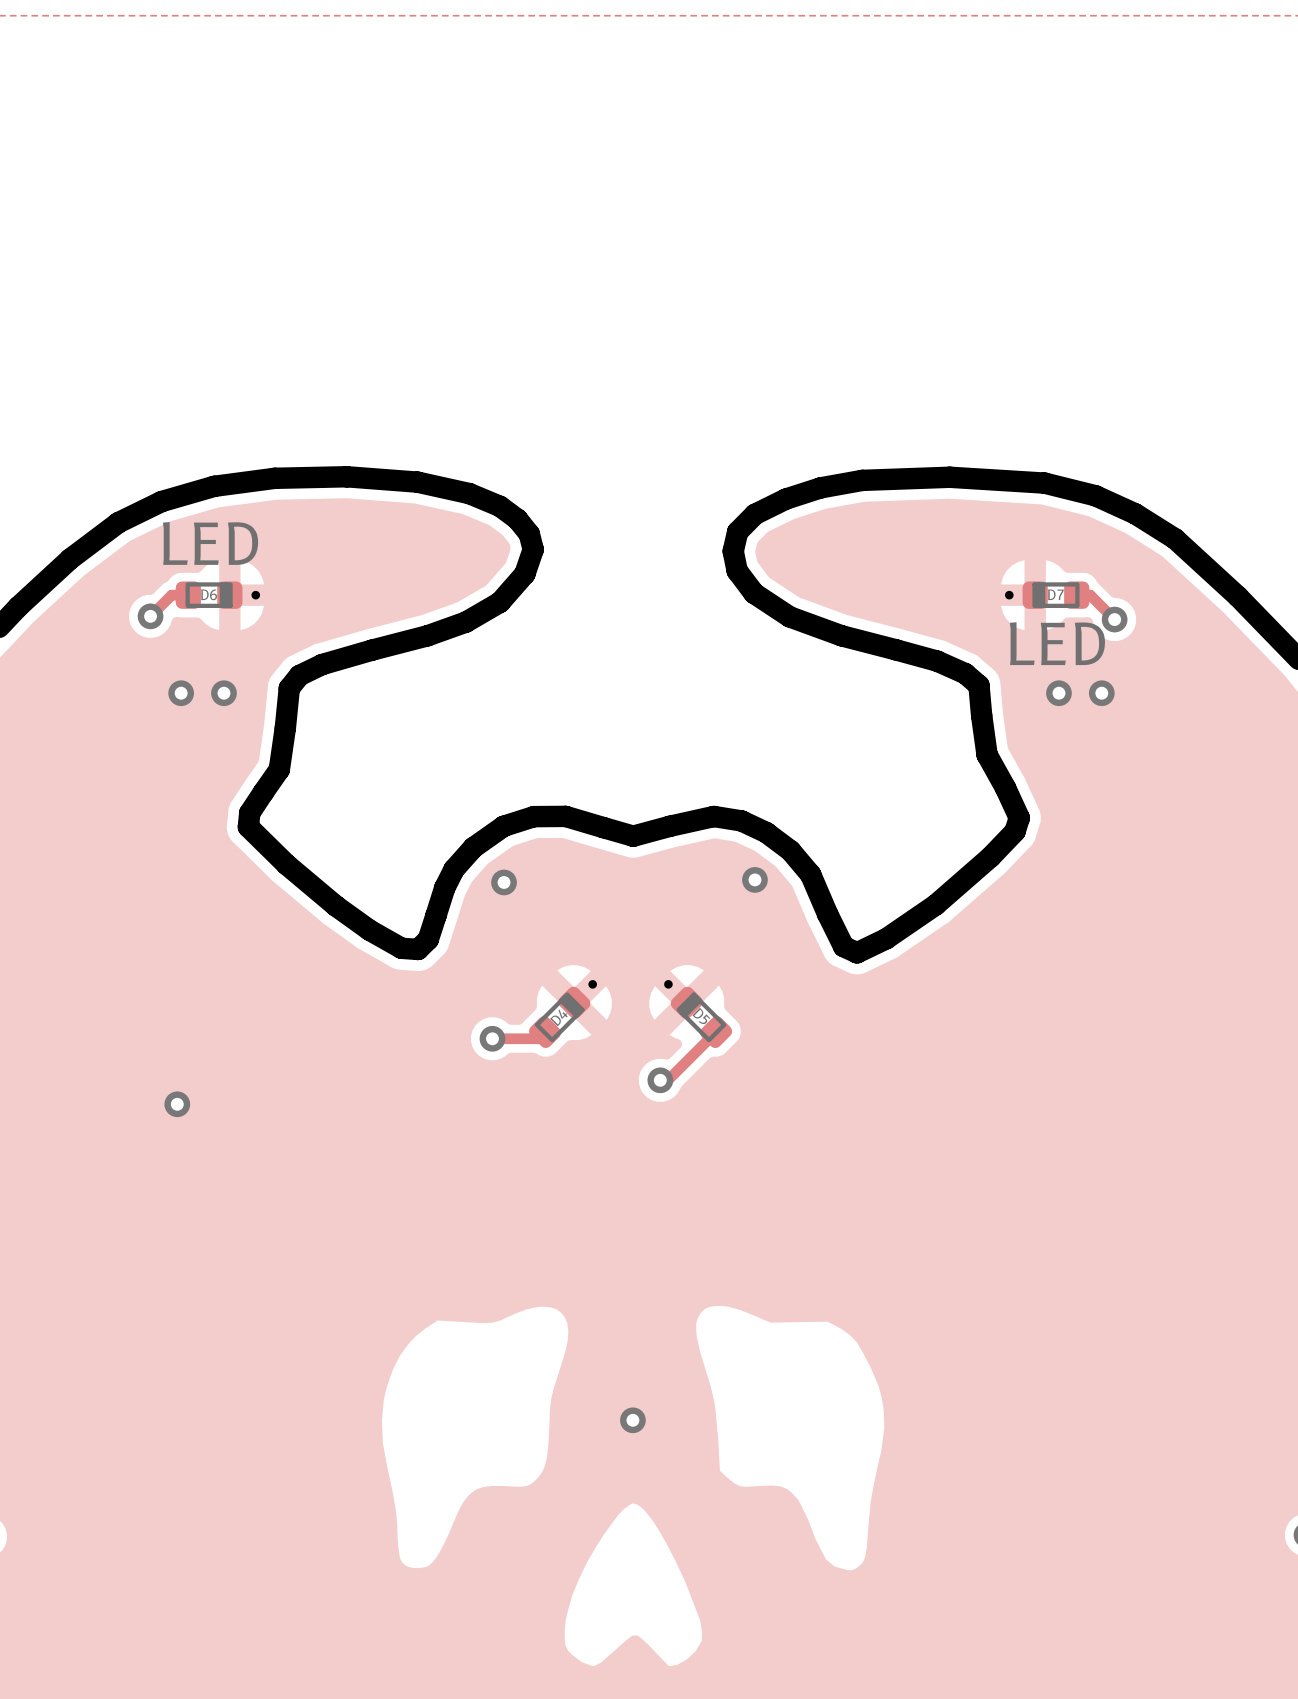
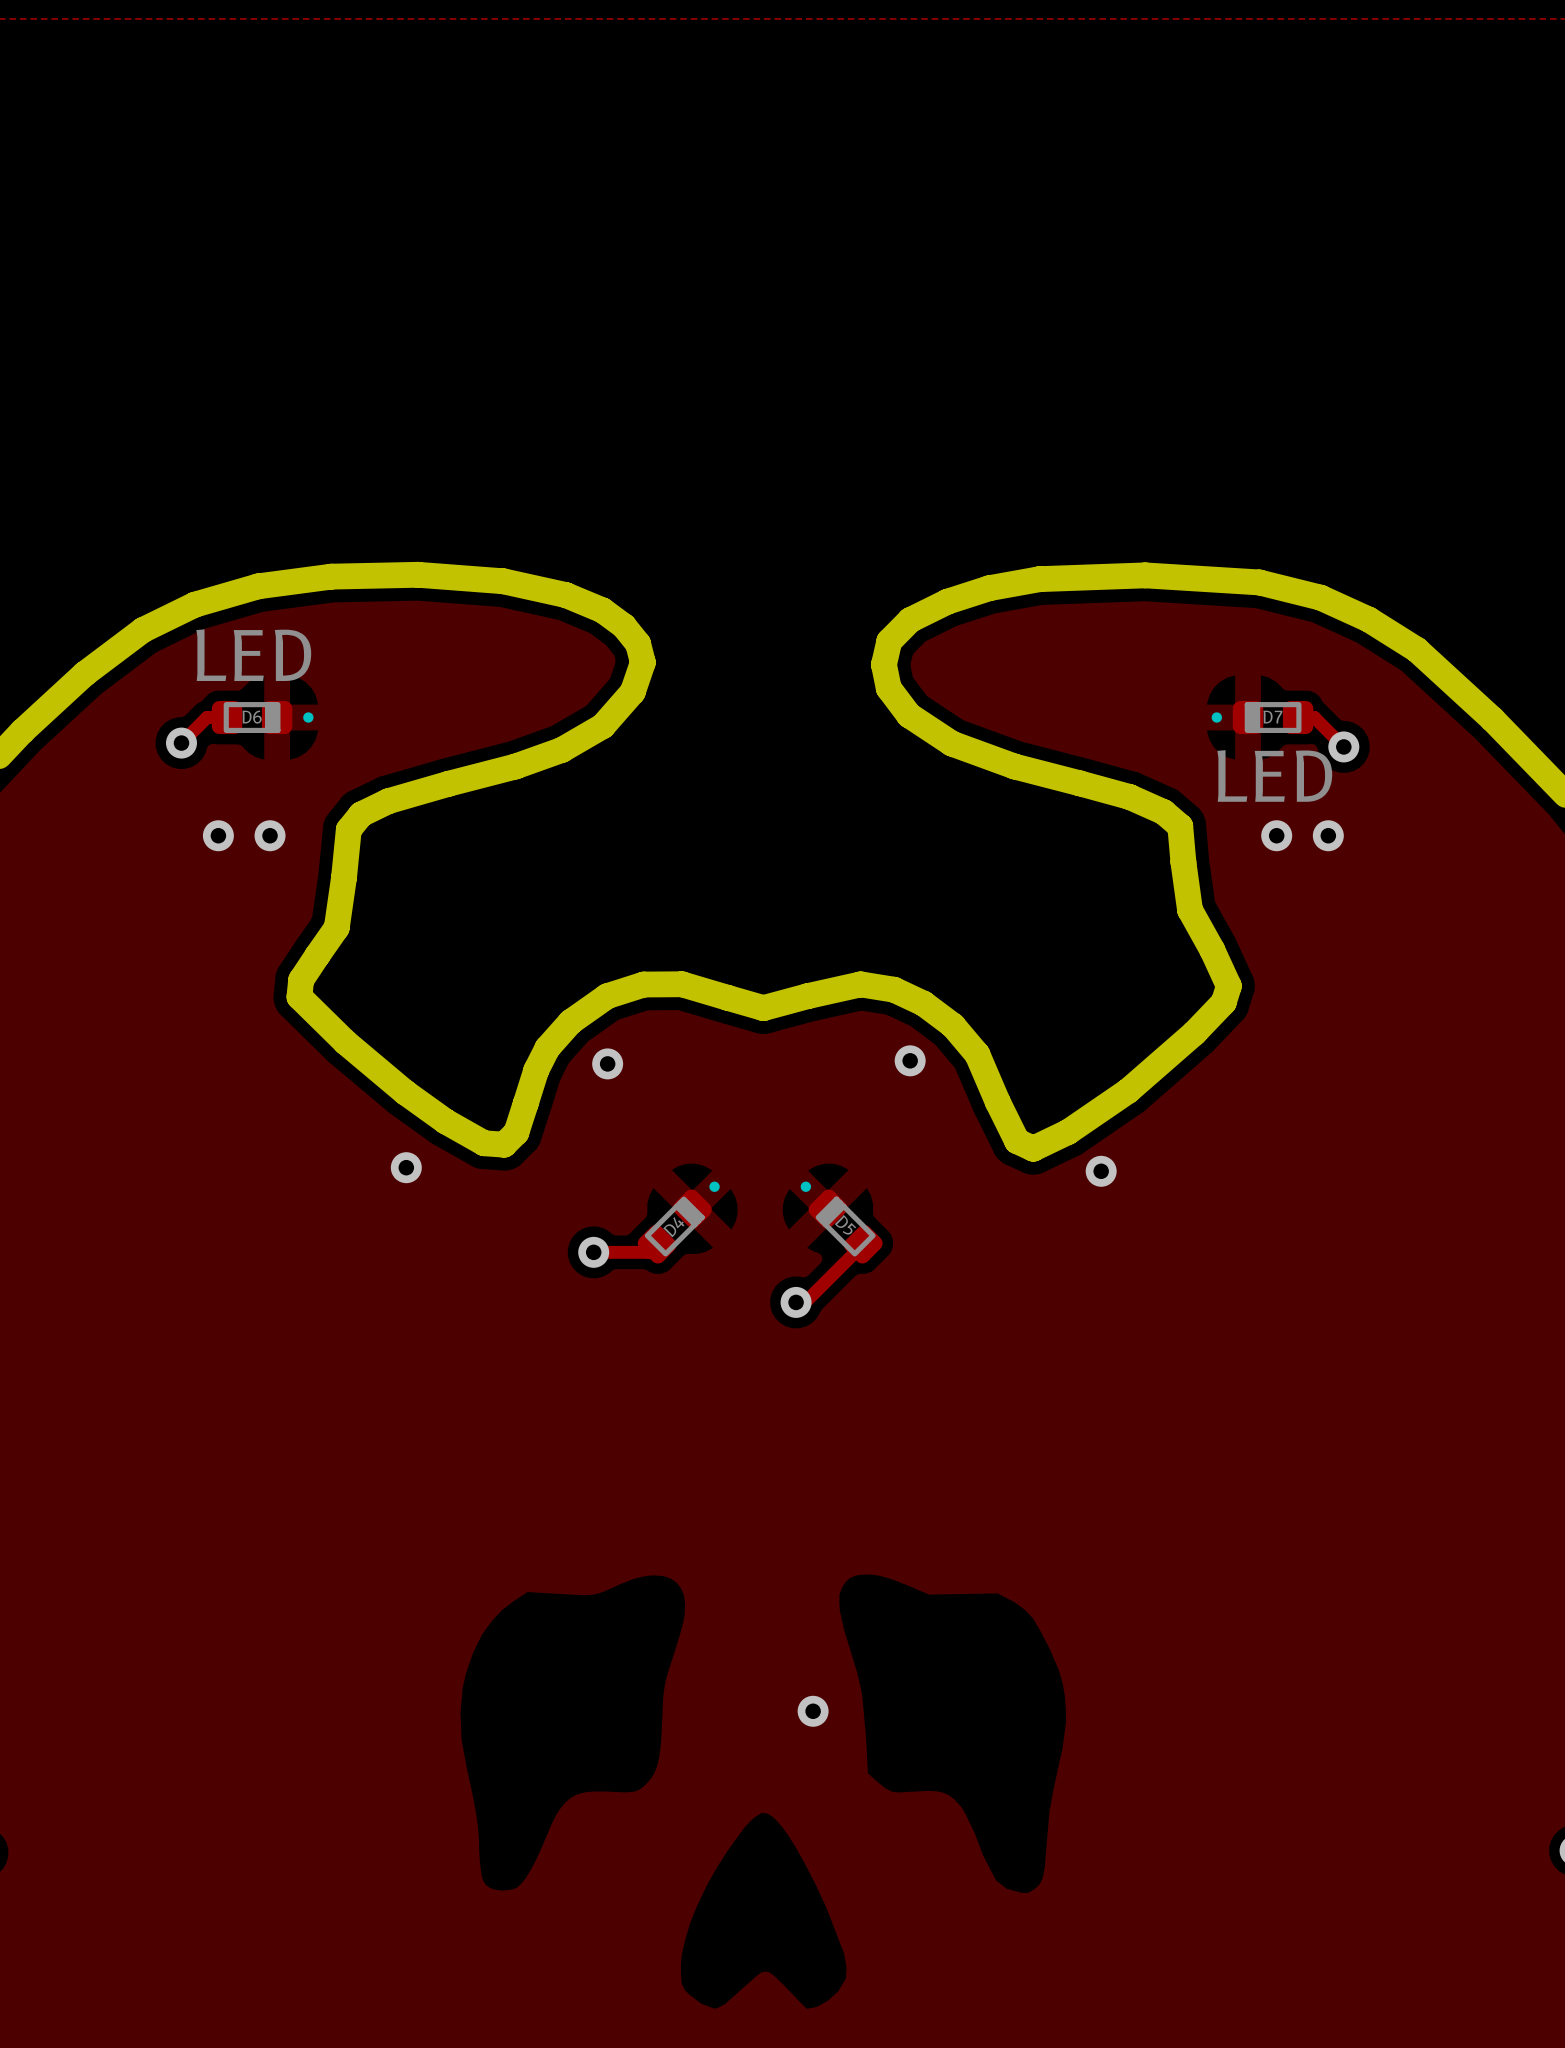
via: none -> (1101, 1171)
via position: (177, 1104) -> (406, 1167)
via position: (632, 1420) -> (813, 1711)

